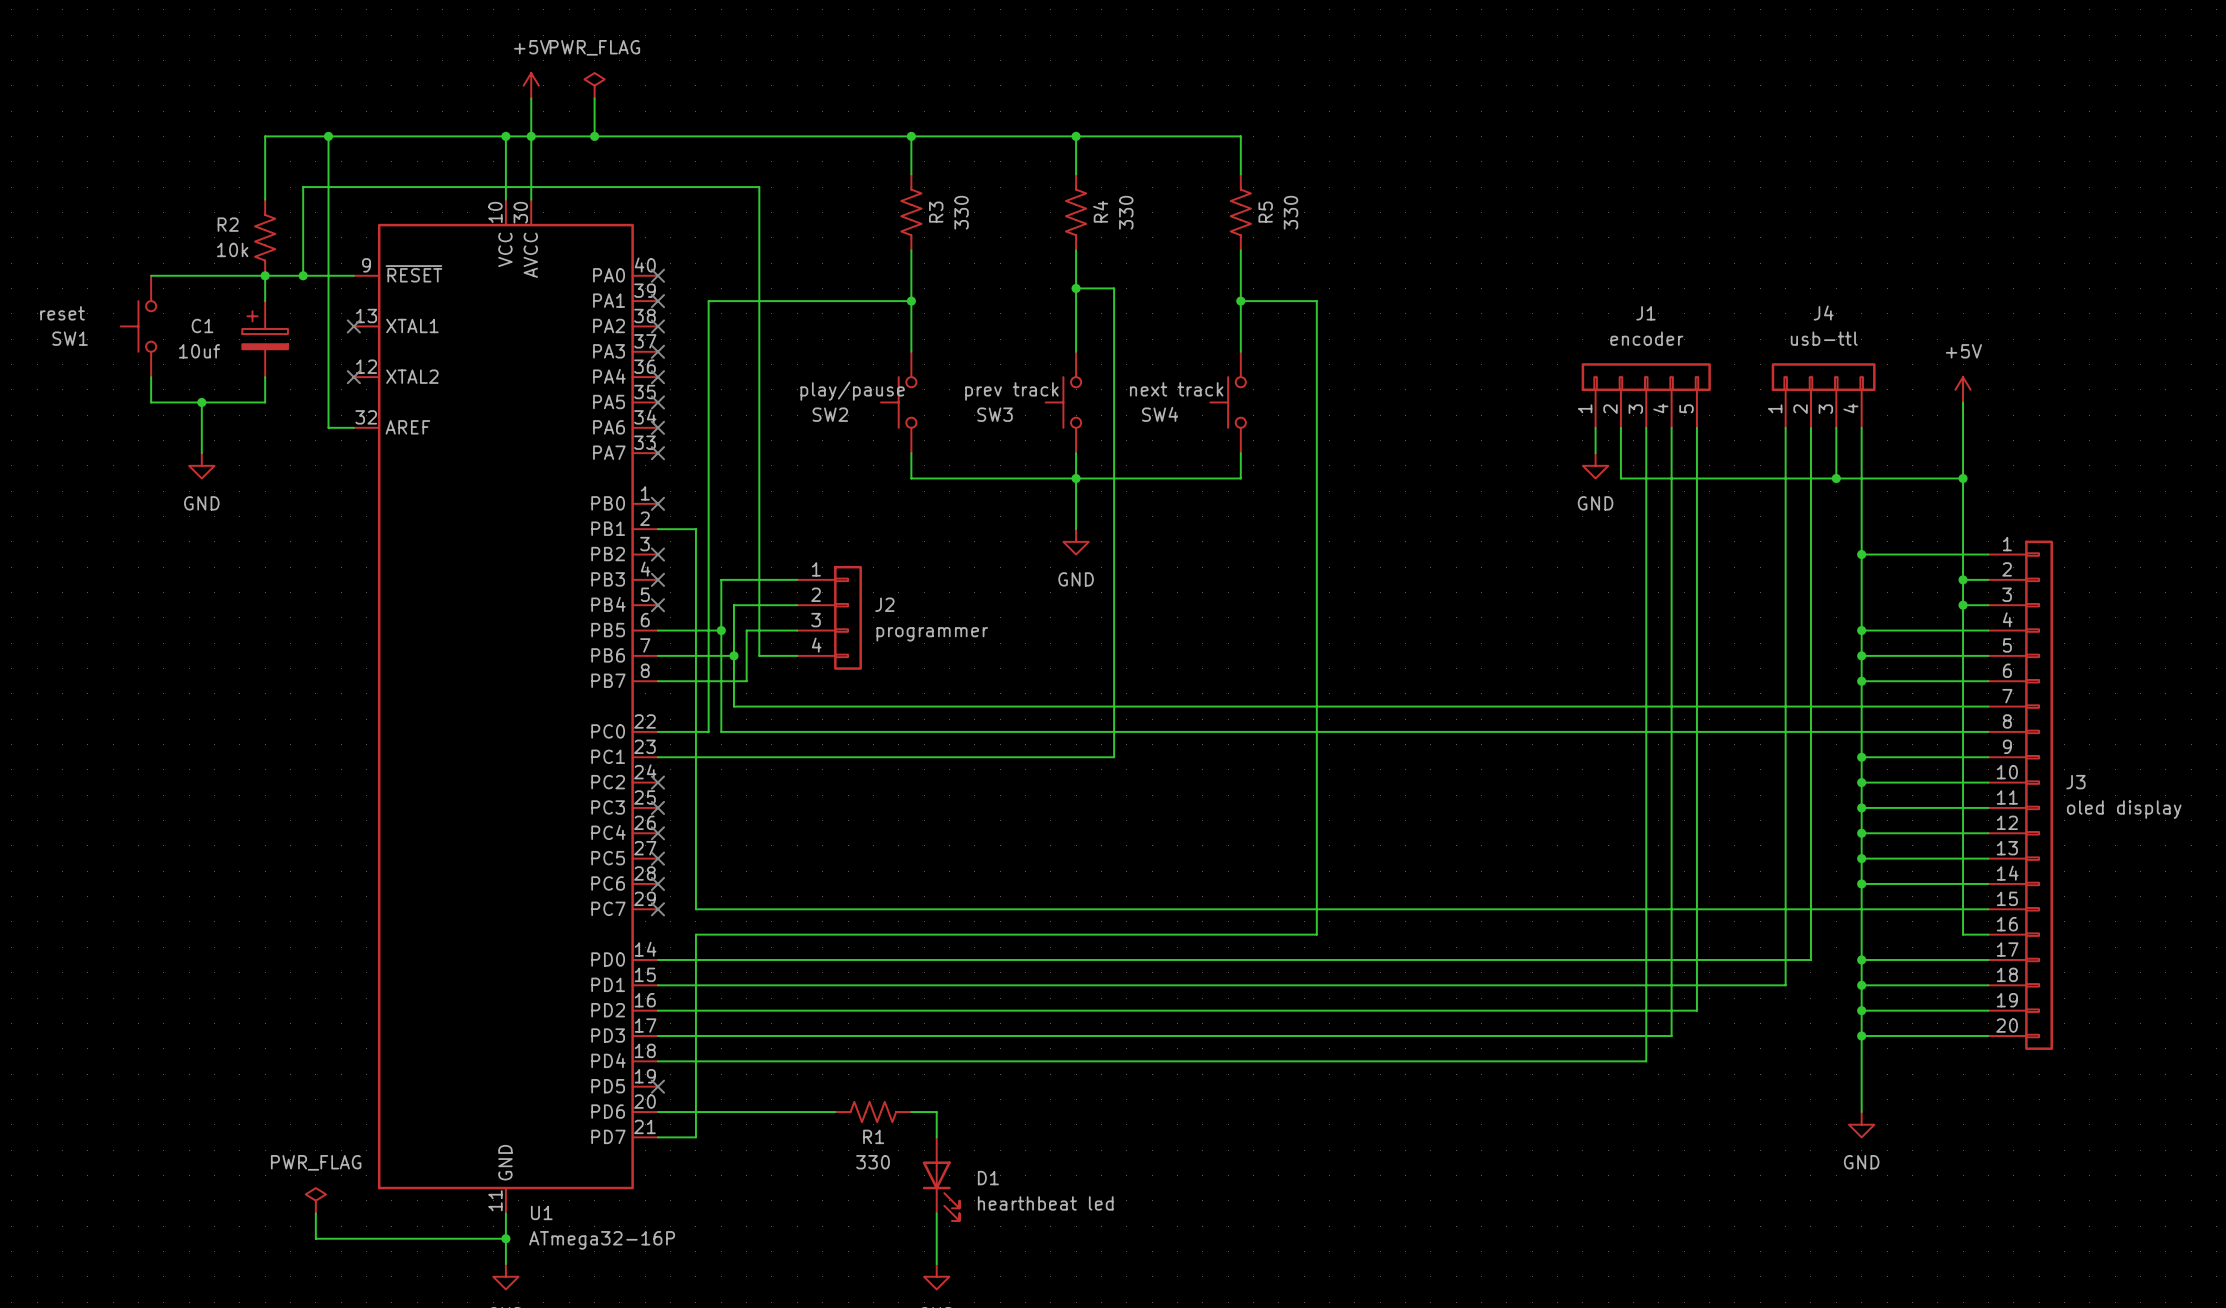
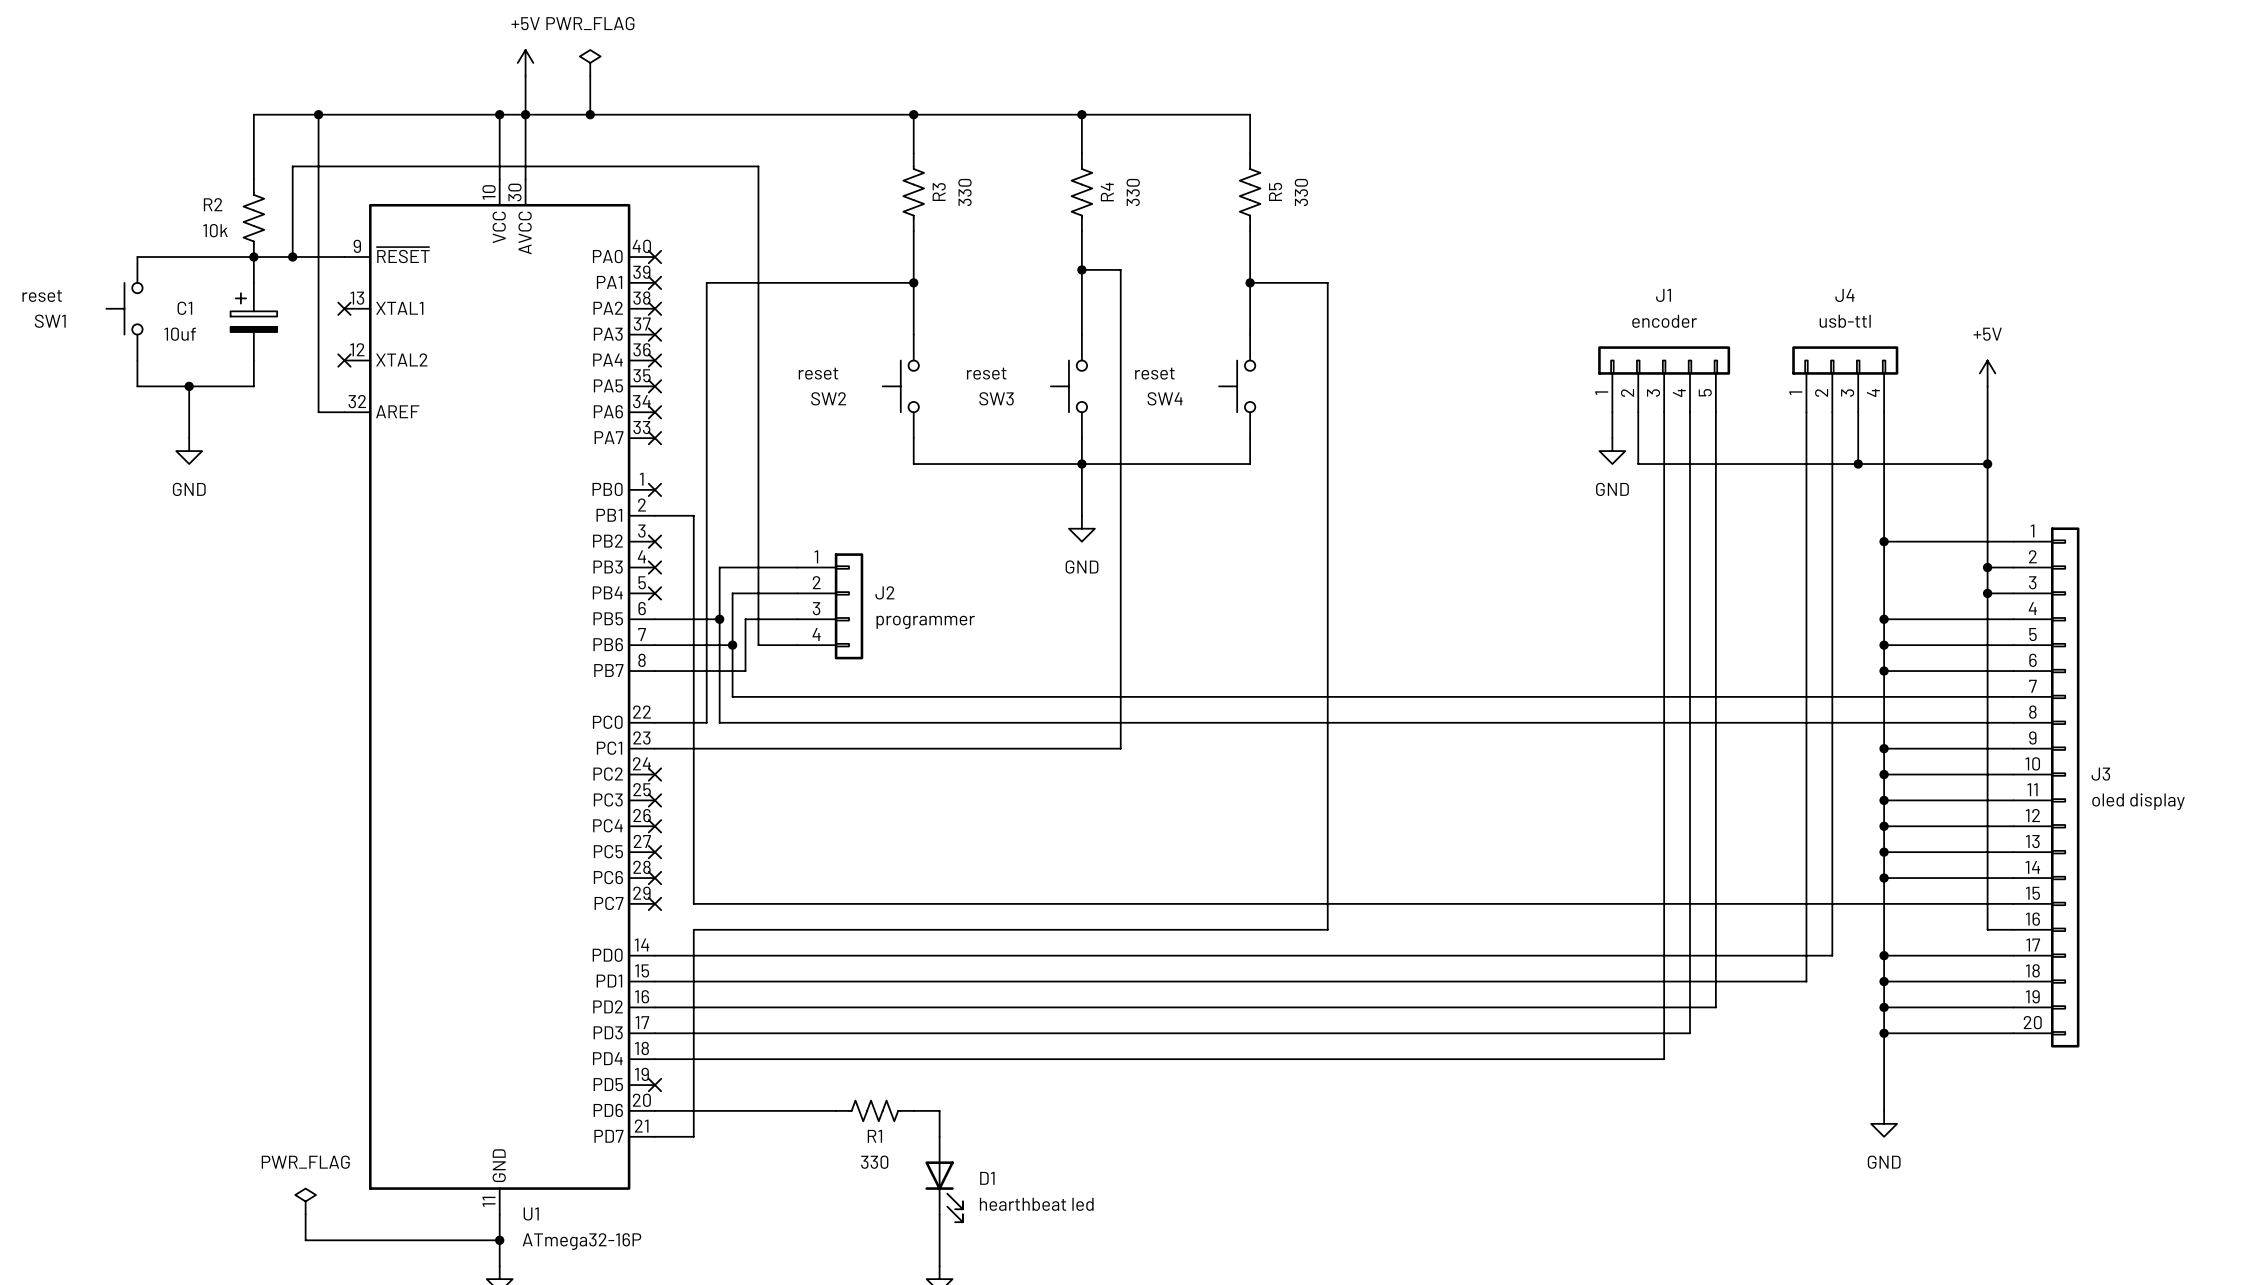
SW4 value: next track (1176, 389) -> reset (1154, 373)
SW2 value: play/pause (852, 391) -> reset (818, 373)
SW3 value: prev track (1011, 391) -> reset (986, 373)

